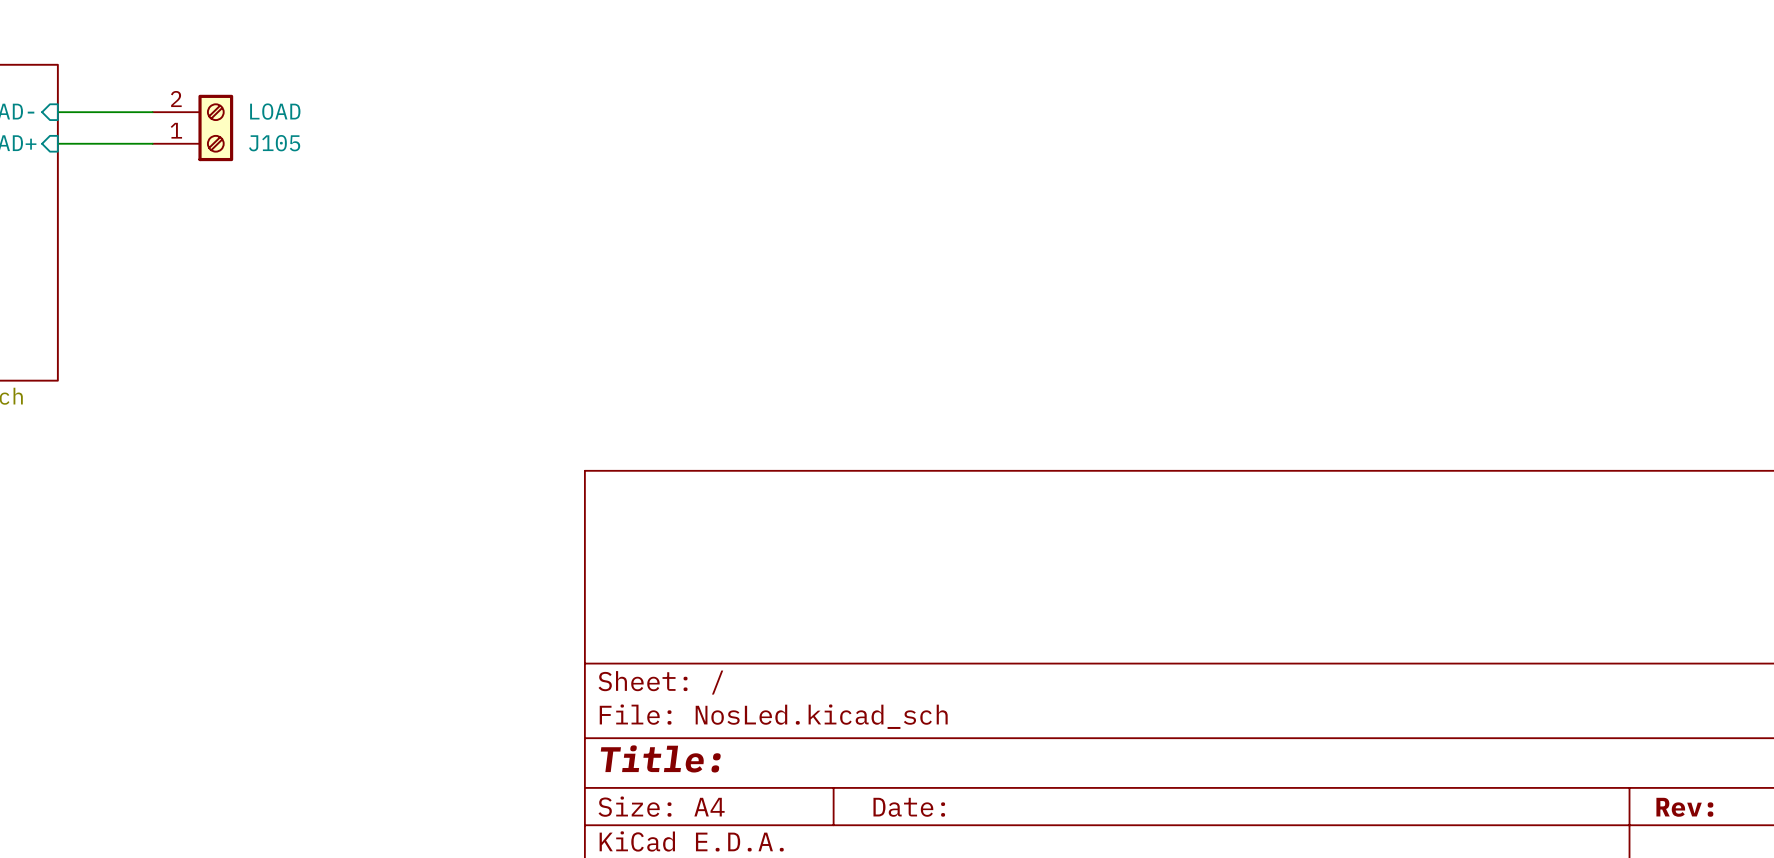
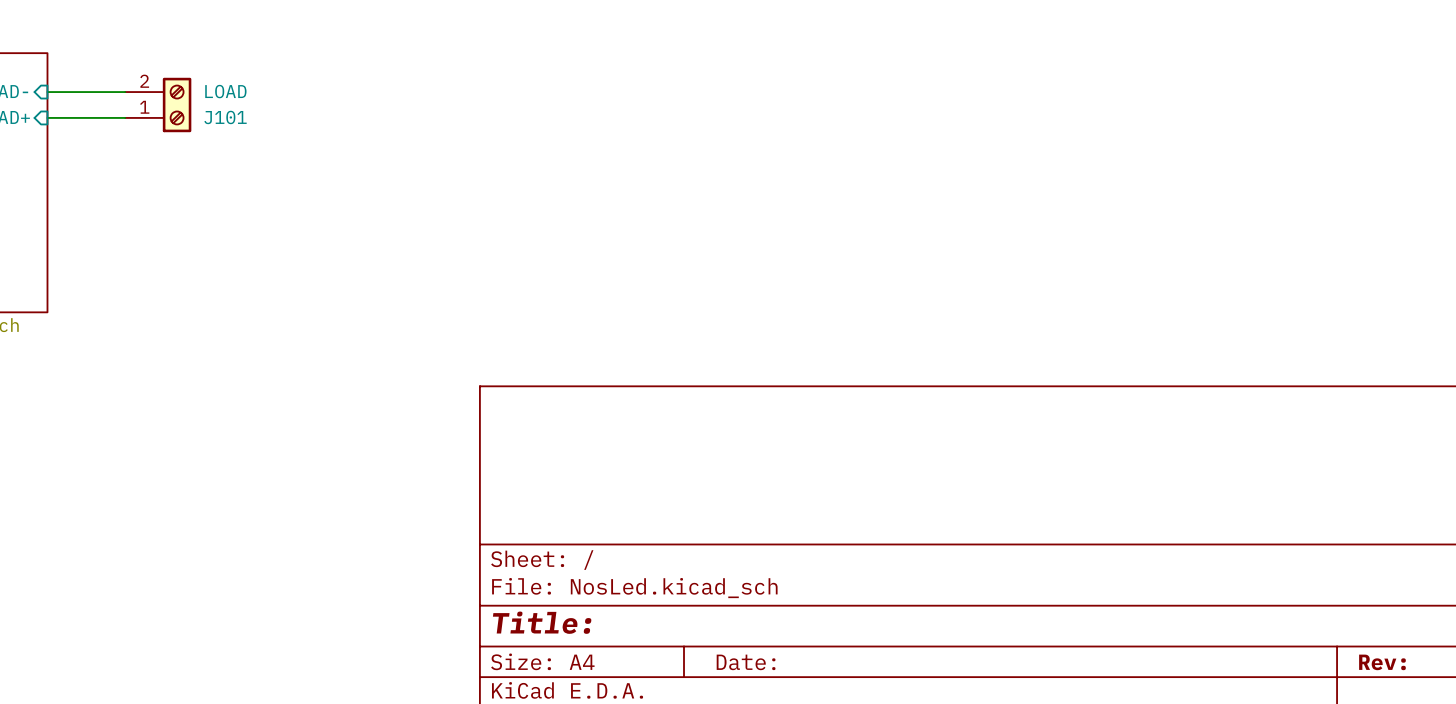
J105 name: J105 (274, 143) -> J101 (225, 117)

